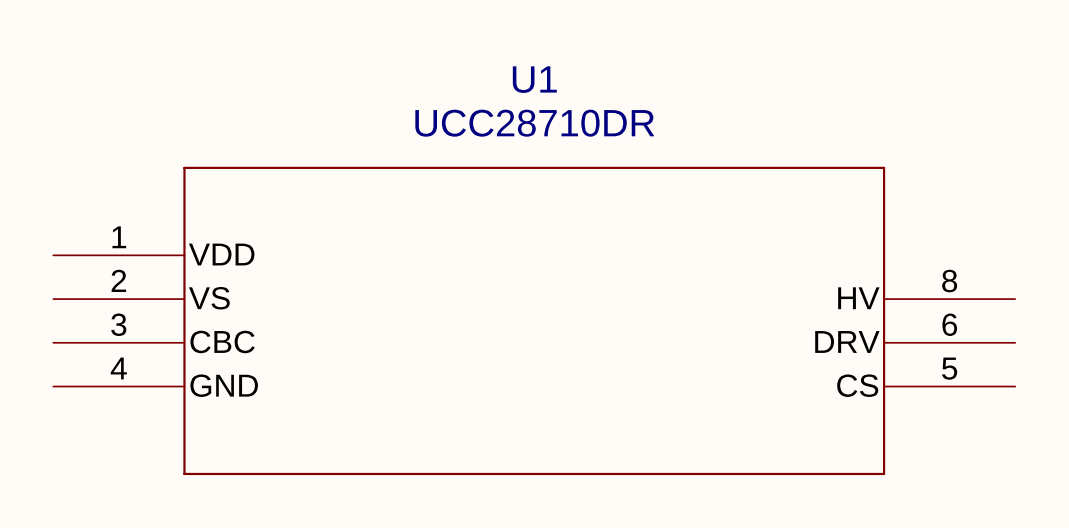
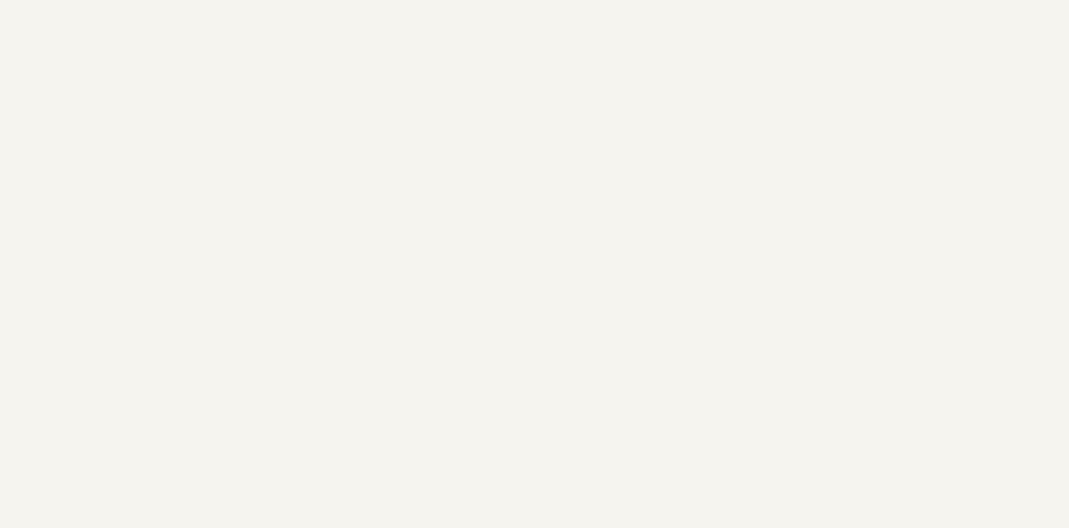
U1: UCC28710DR (534, 320) -> none

